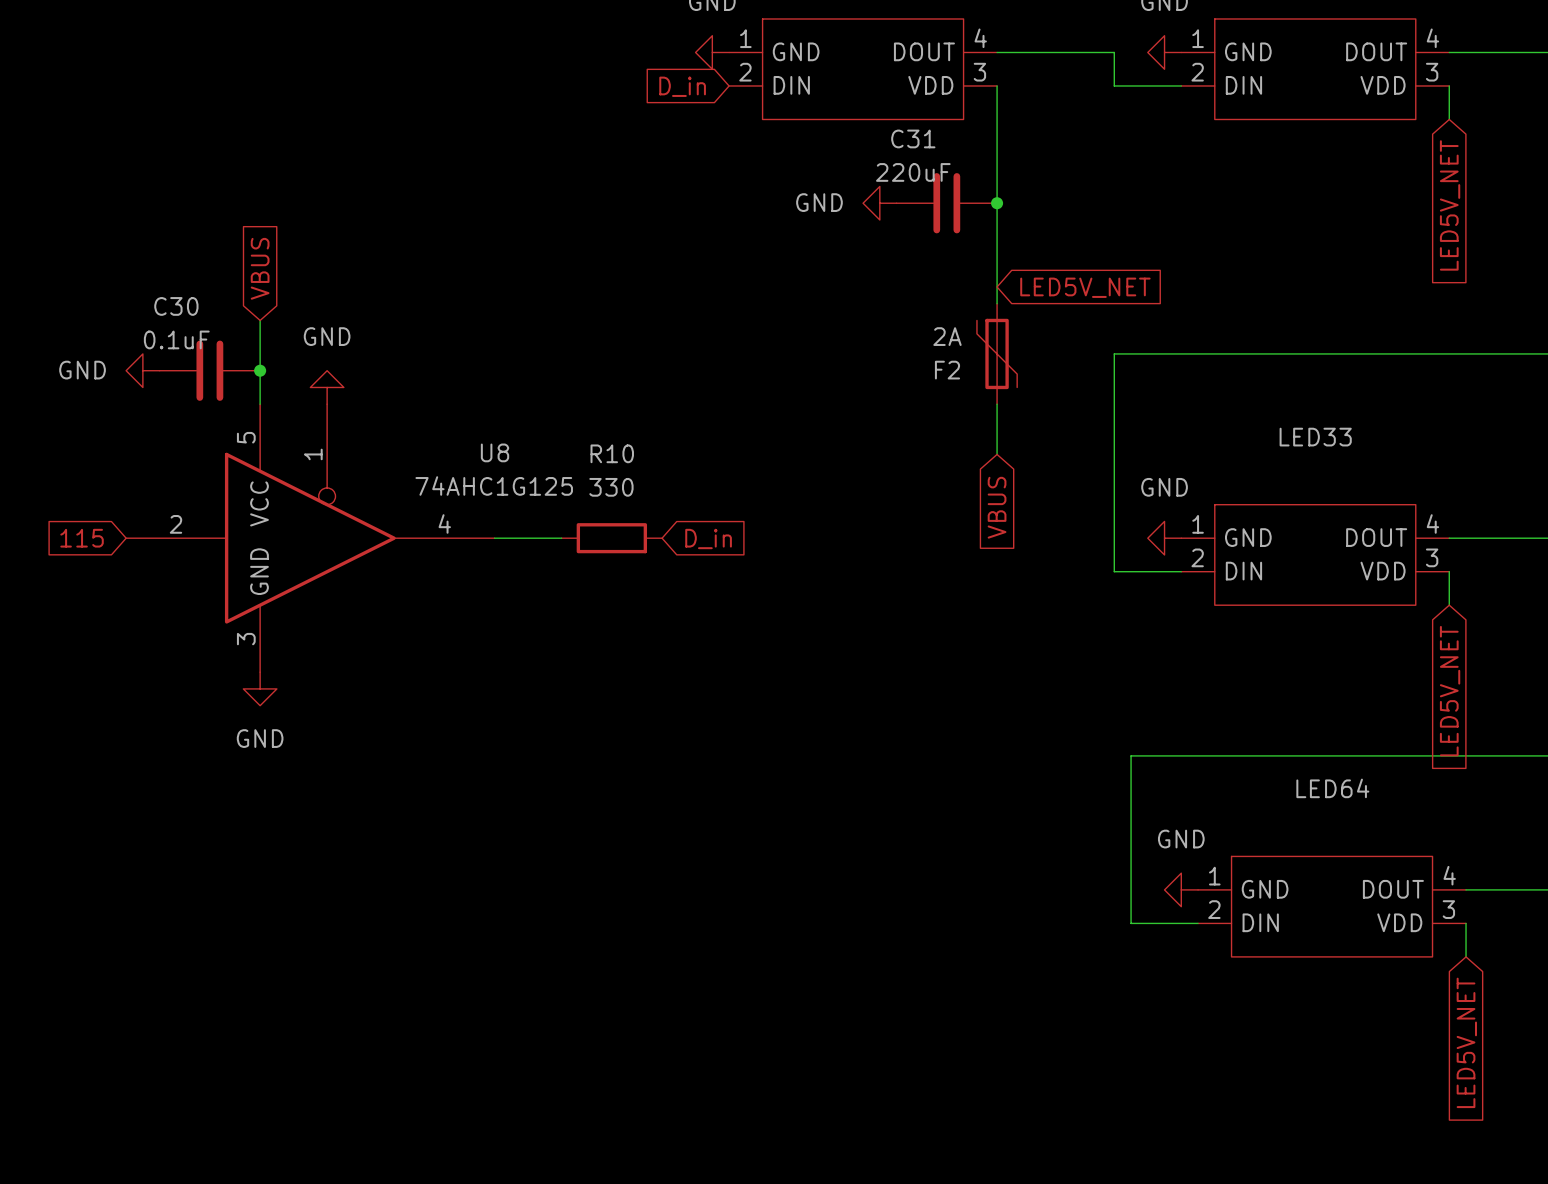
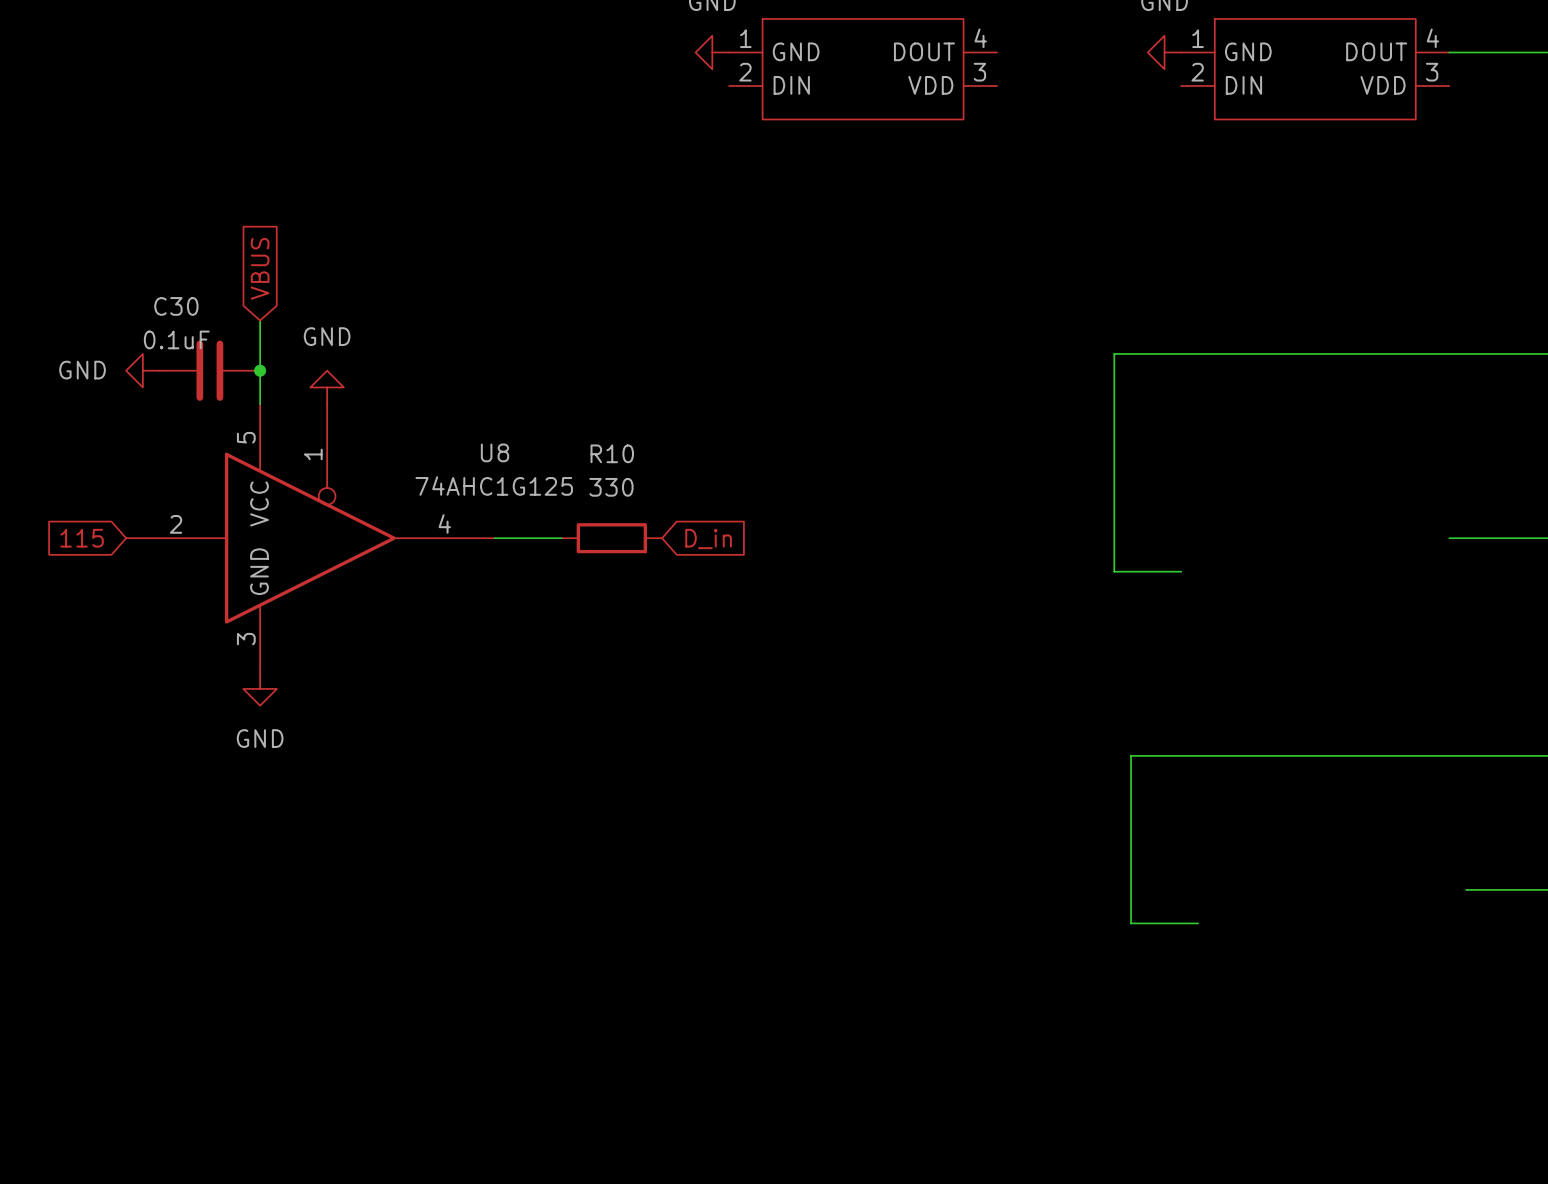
wire: (997, 52) (1114, 52) (1114, 85) (1181, 85) -> none
wire: (997, 85) (997, 303) -> none
wire: (1449, 85) (1449, 119) -> none
global label: D_in (682, 86) -> none
power symbol: GND (879, 203) -> none
C31: 220uF (946, 203) -> none
junction: (997, 203) -> none
global label: LED5V_NET (1450, 205) -> none
global label: LED5V_NET (1085, 287) -> none
F2: 2A (997, 353) -> none
wire: (997, 404) (997, 454) -> none
global label: VBUS (997, 507) -> none
power symbol: GND (1164, 538) -> none
LED33: (1315, 554) -> none
wire: (1449, 571) (1449, 605) -> none
global label: LED5V_NET (1450, 691) -> none
power symbol: GND (1181, 889) -> none
LED64: (1332, 906) -> none
wire: (1466, 923) (1466, 956) -> none
global label: LED5V_NET (1466, 1042) -> none

